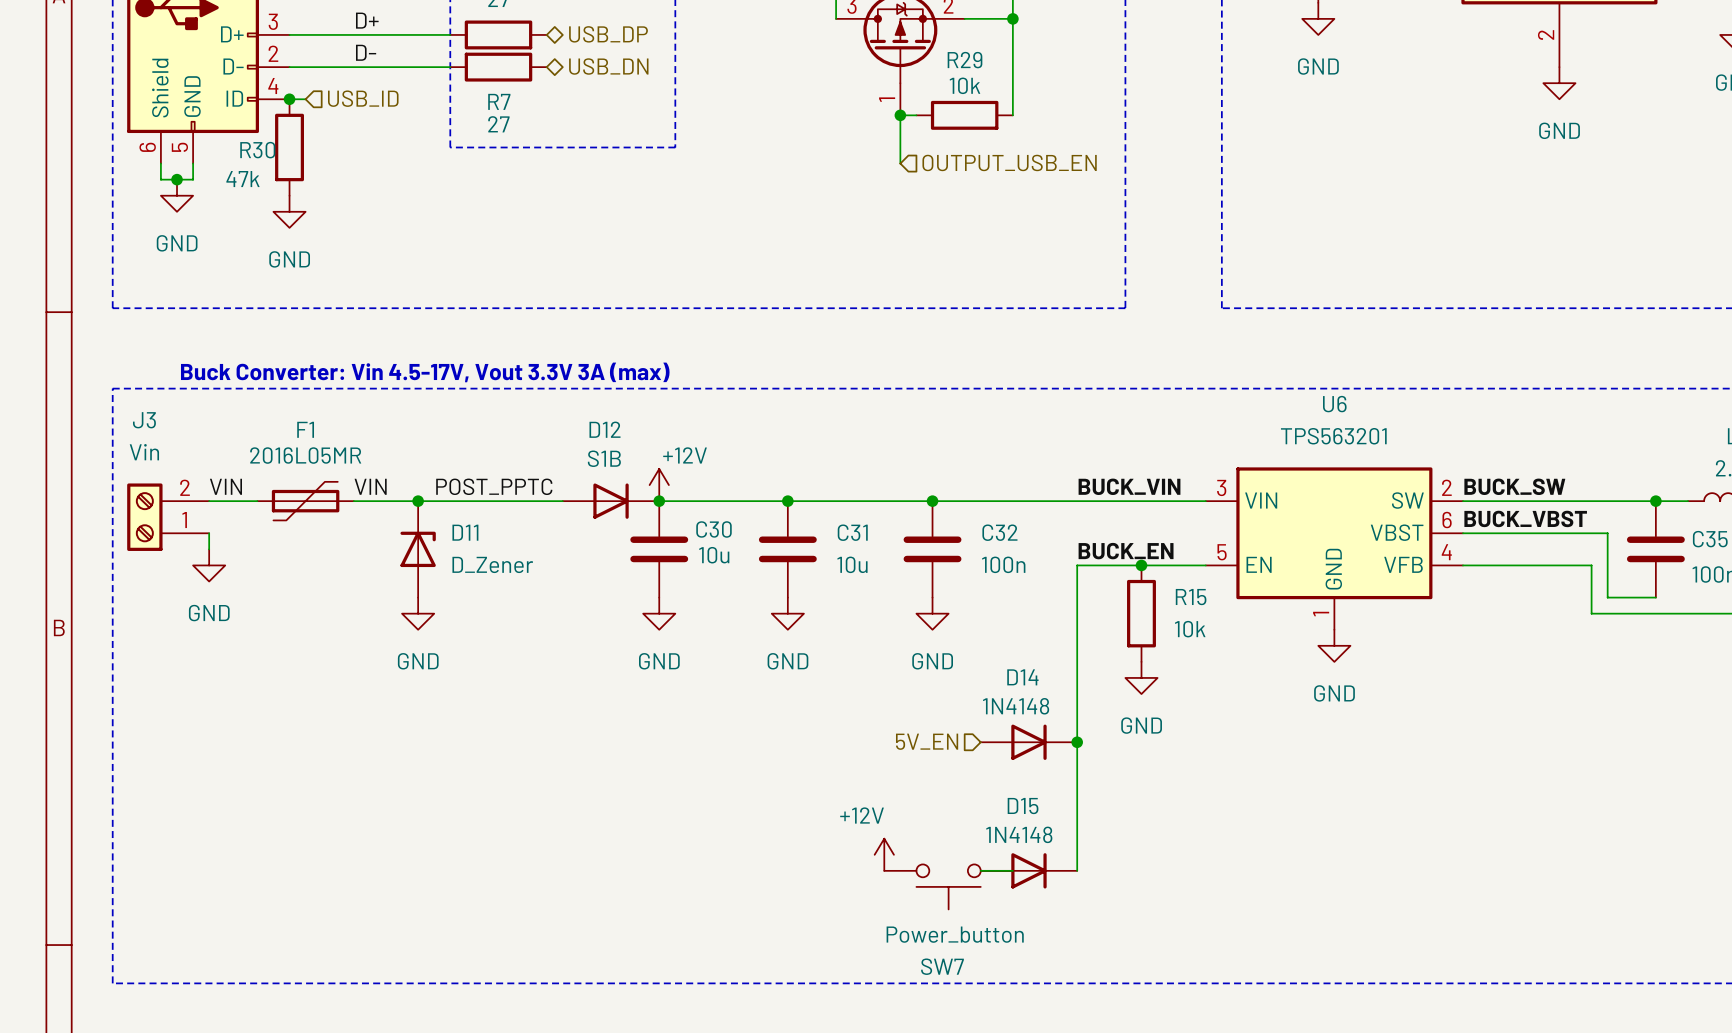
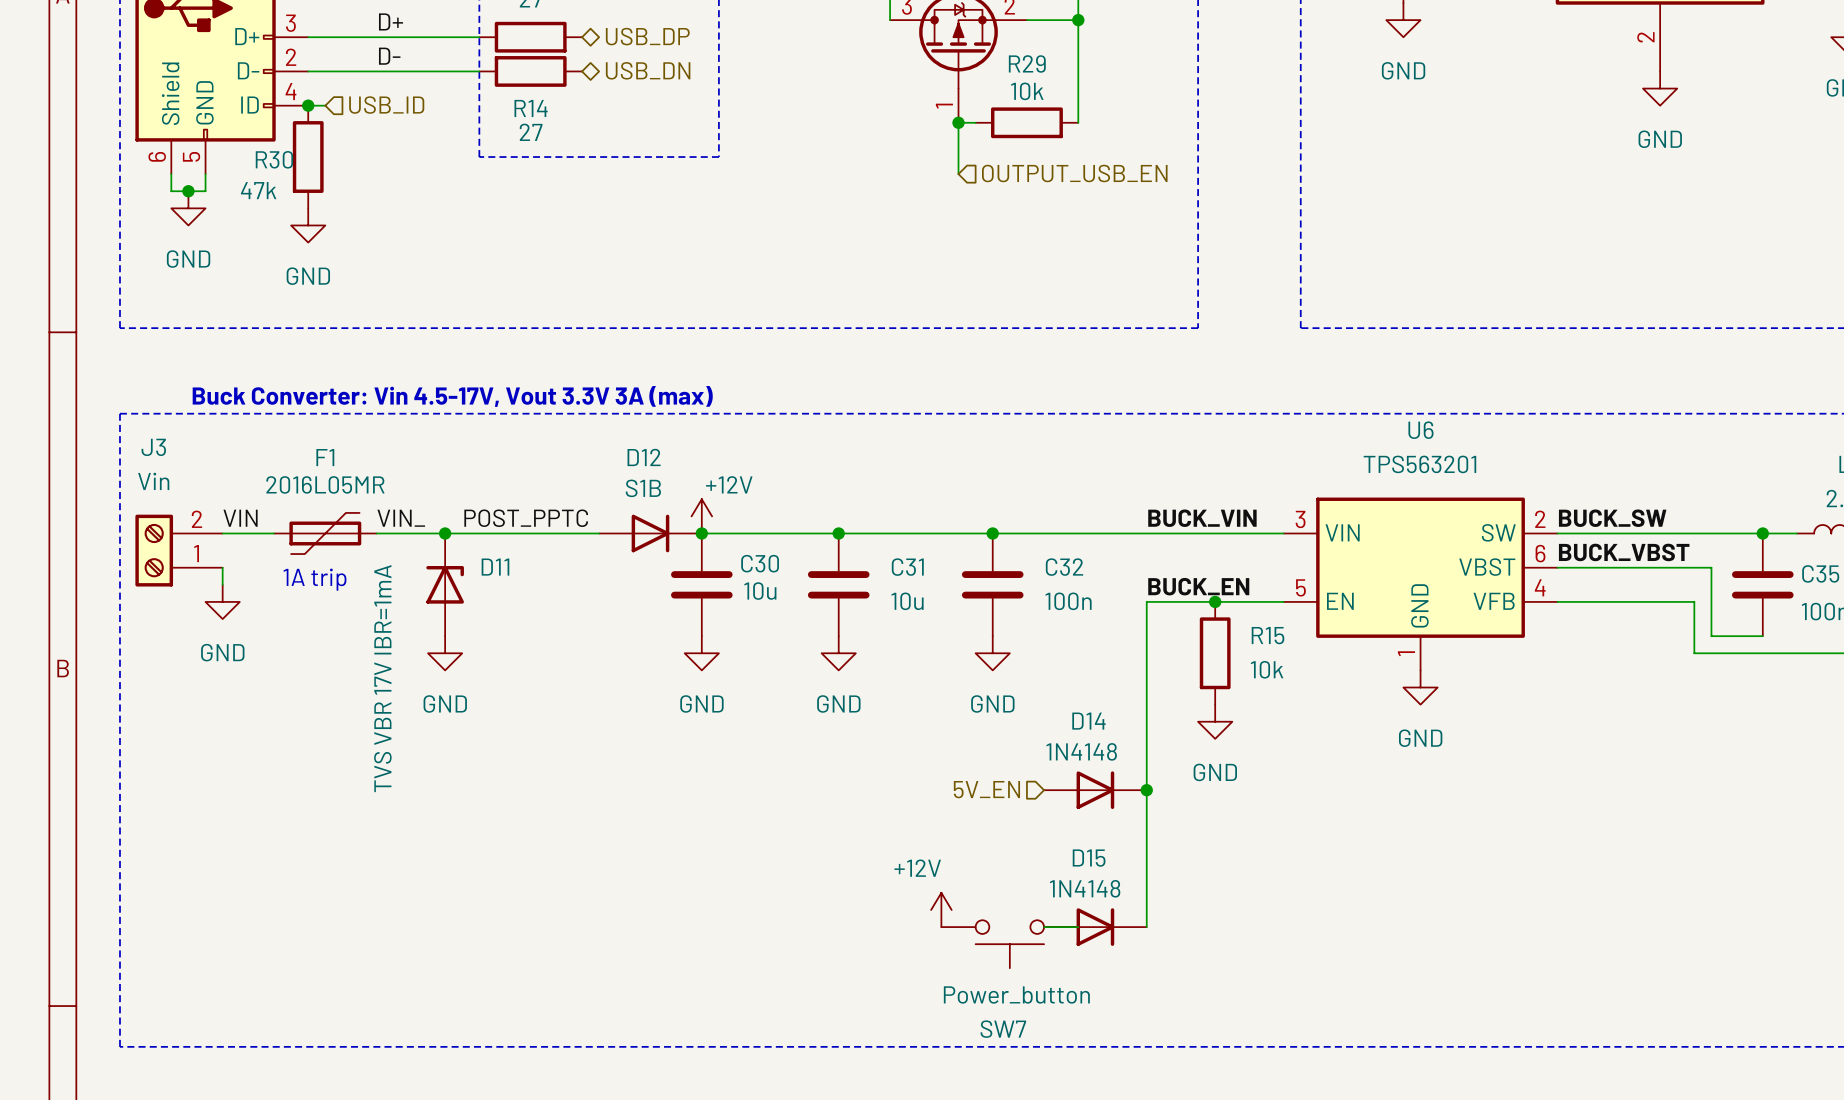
R7 name: R7 (499, 101) -> R14 (531, 108)
label: VIN (370, 486) -> VIN_ (401, 518)
text: none -> 1A trip (314, 579)
D11 value: D_Zener (492, 564) -> TVS VBR 17V IBR=1mA (382, 678)

